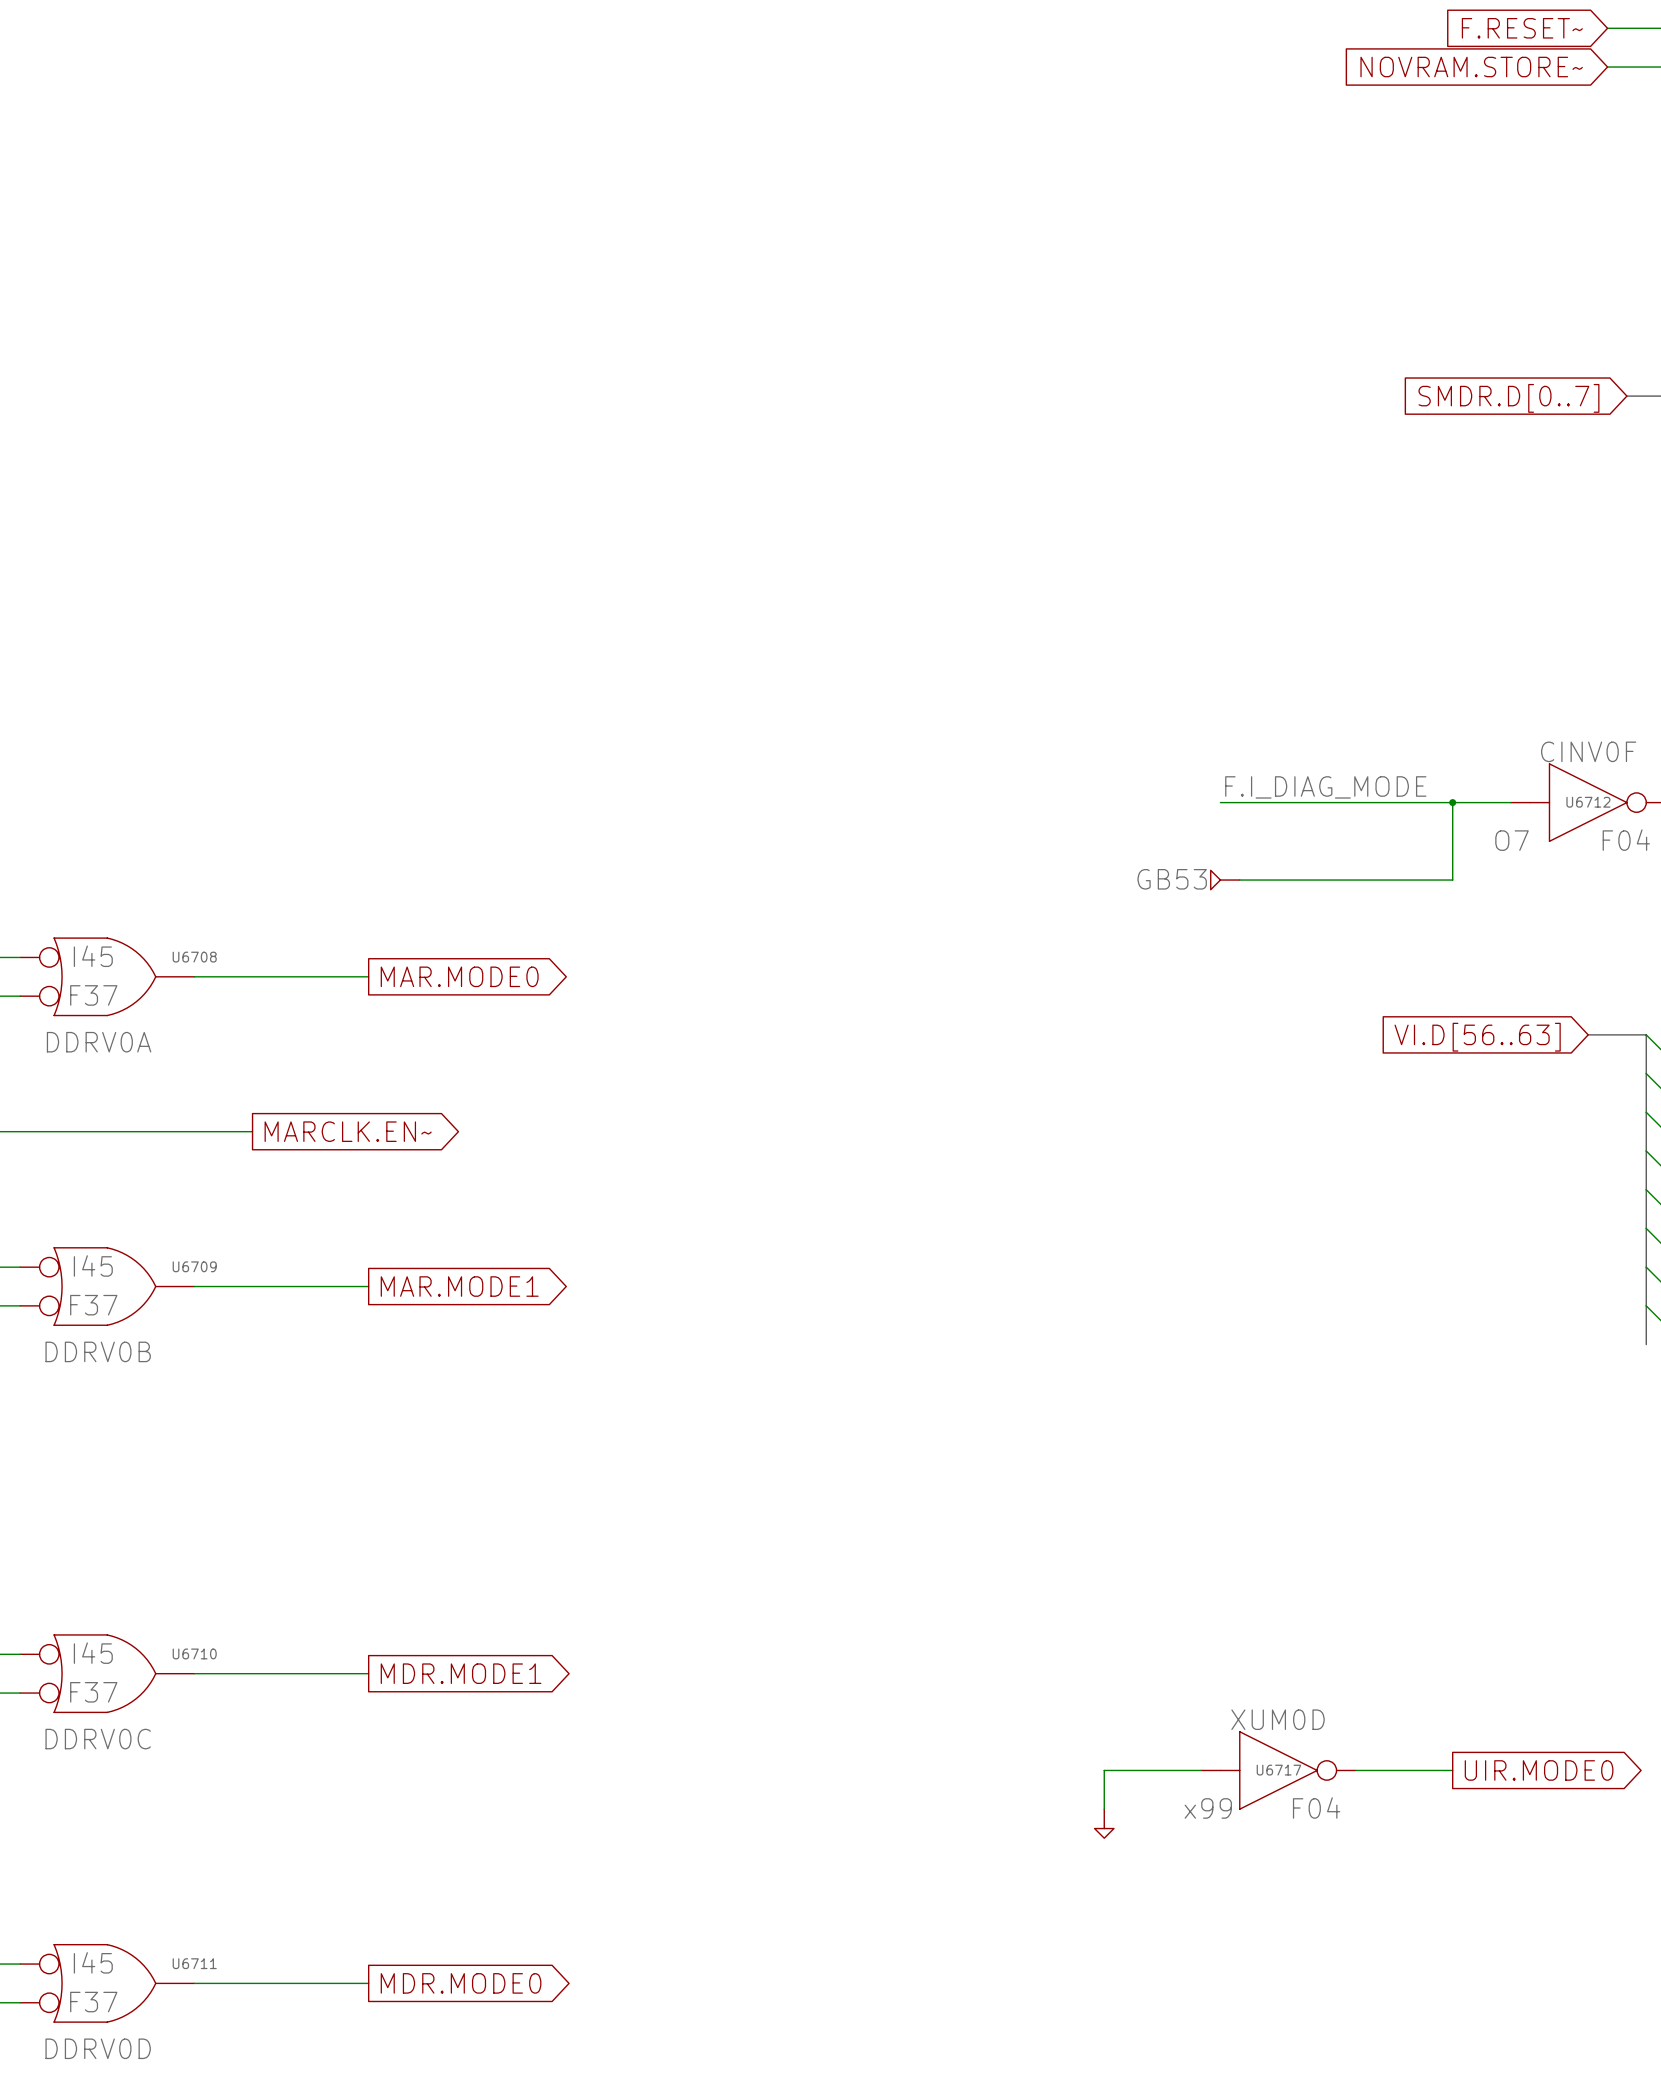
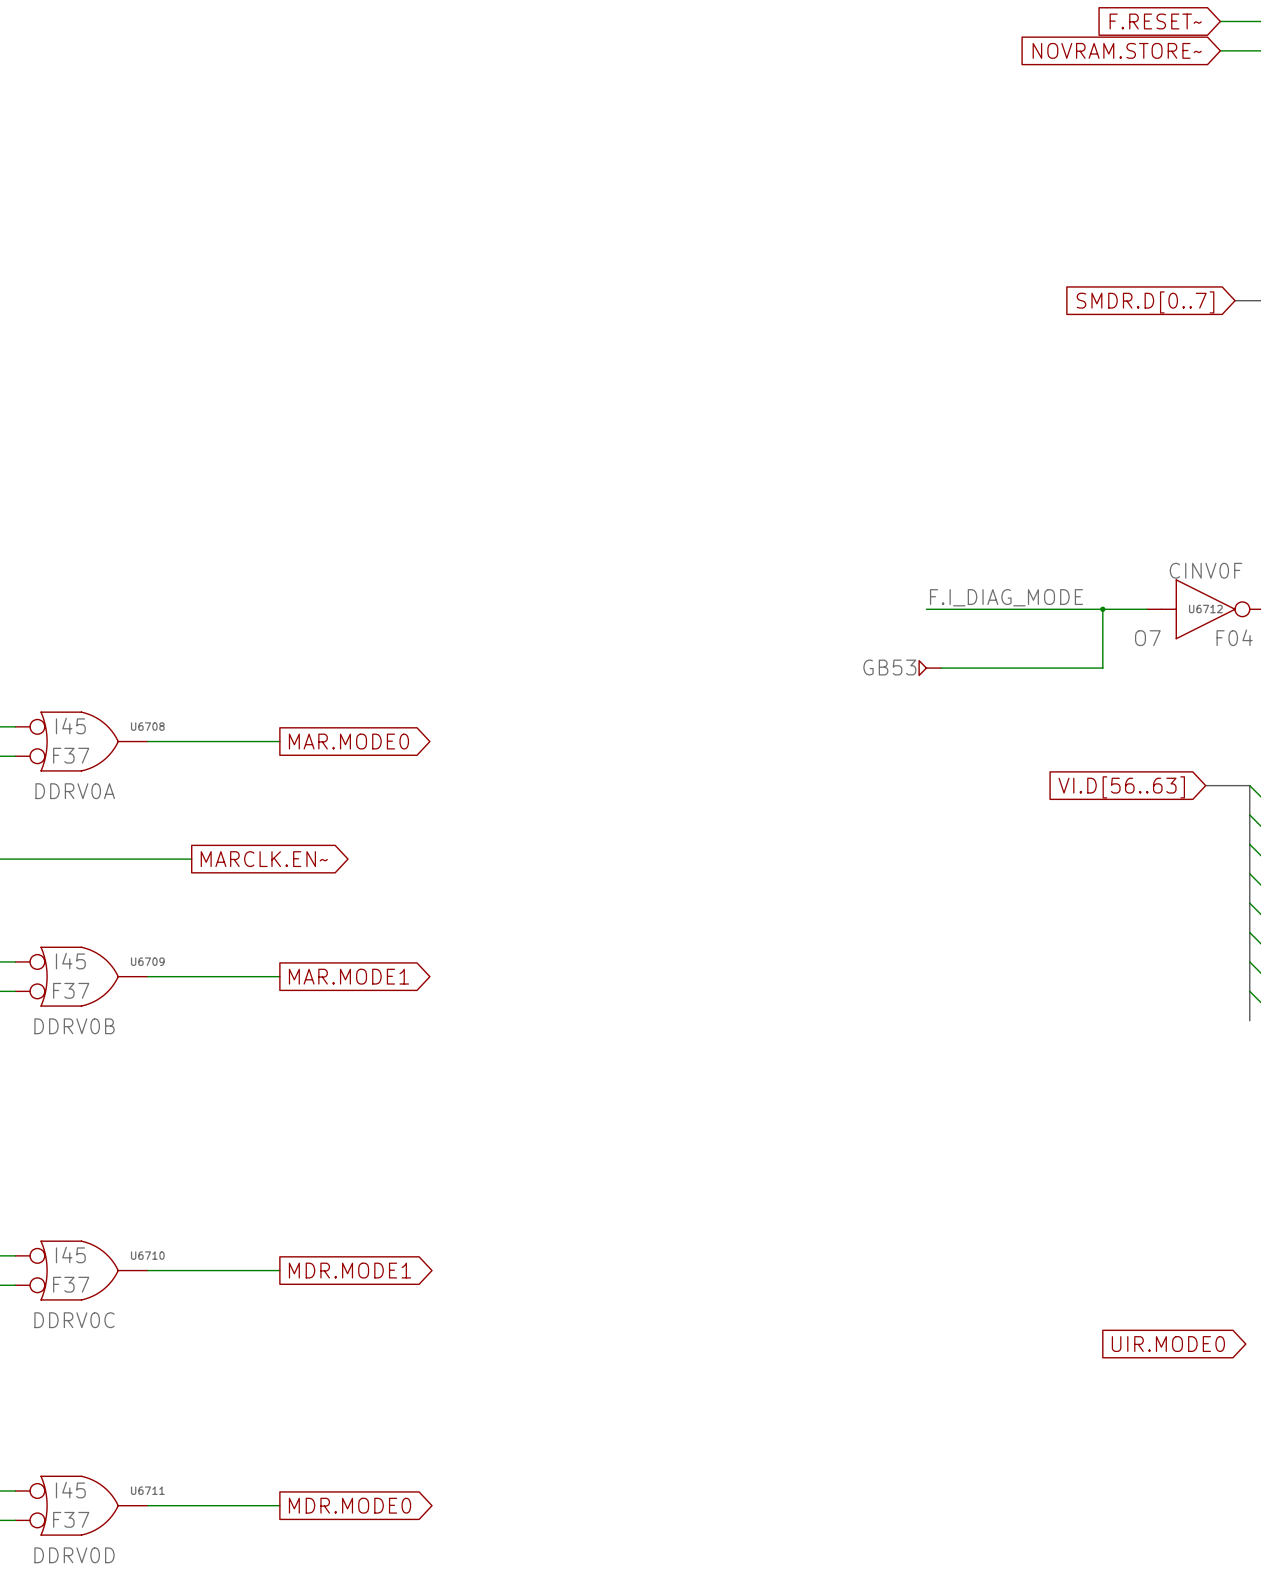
wire: (1201, 1770) (1104, 1770) (1104, 1809) -> none
U6717: F04 (1278, 1770) -> none
wire: (1355, 1770) (1452, 1770) -> none
power symbol: (1104, 1823) -> none

